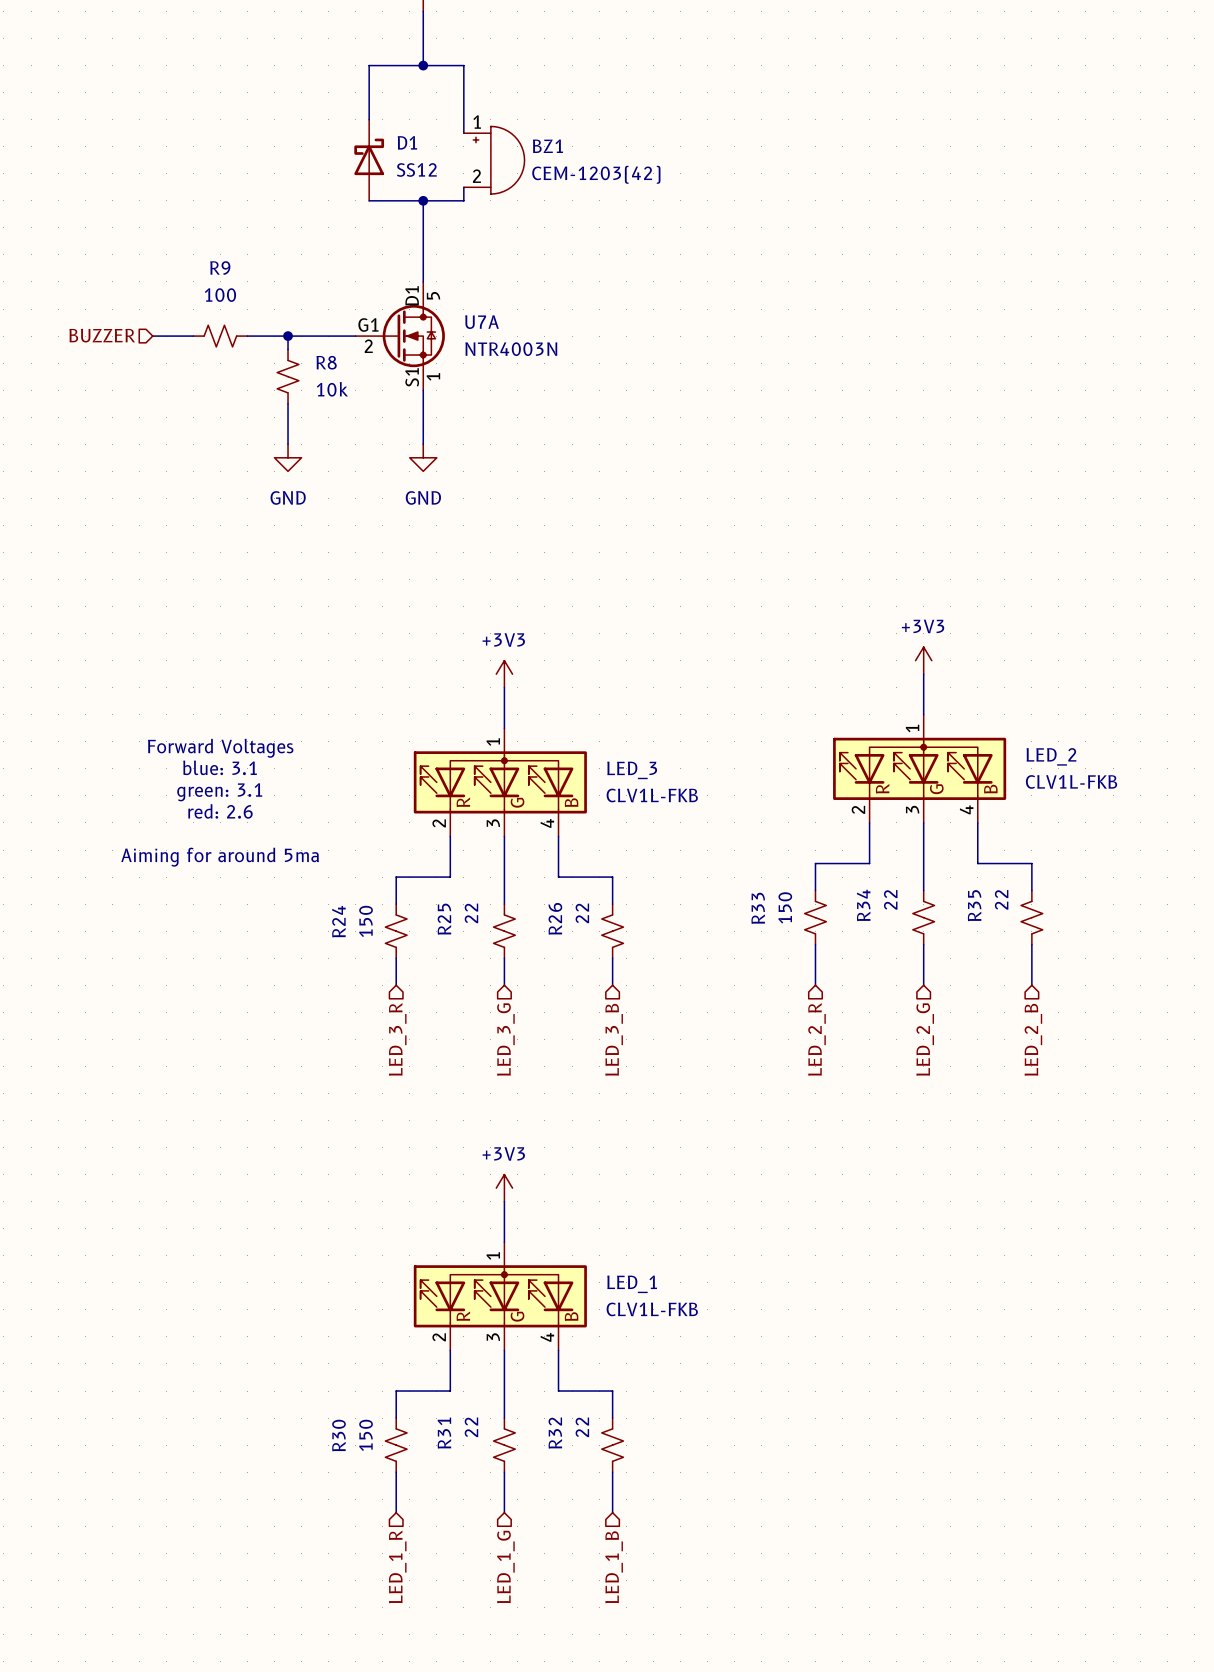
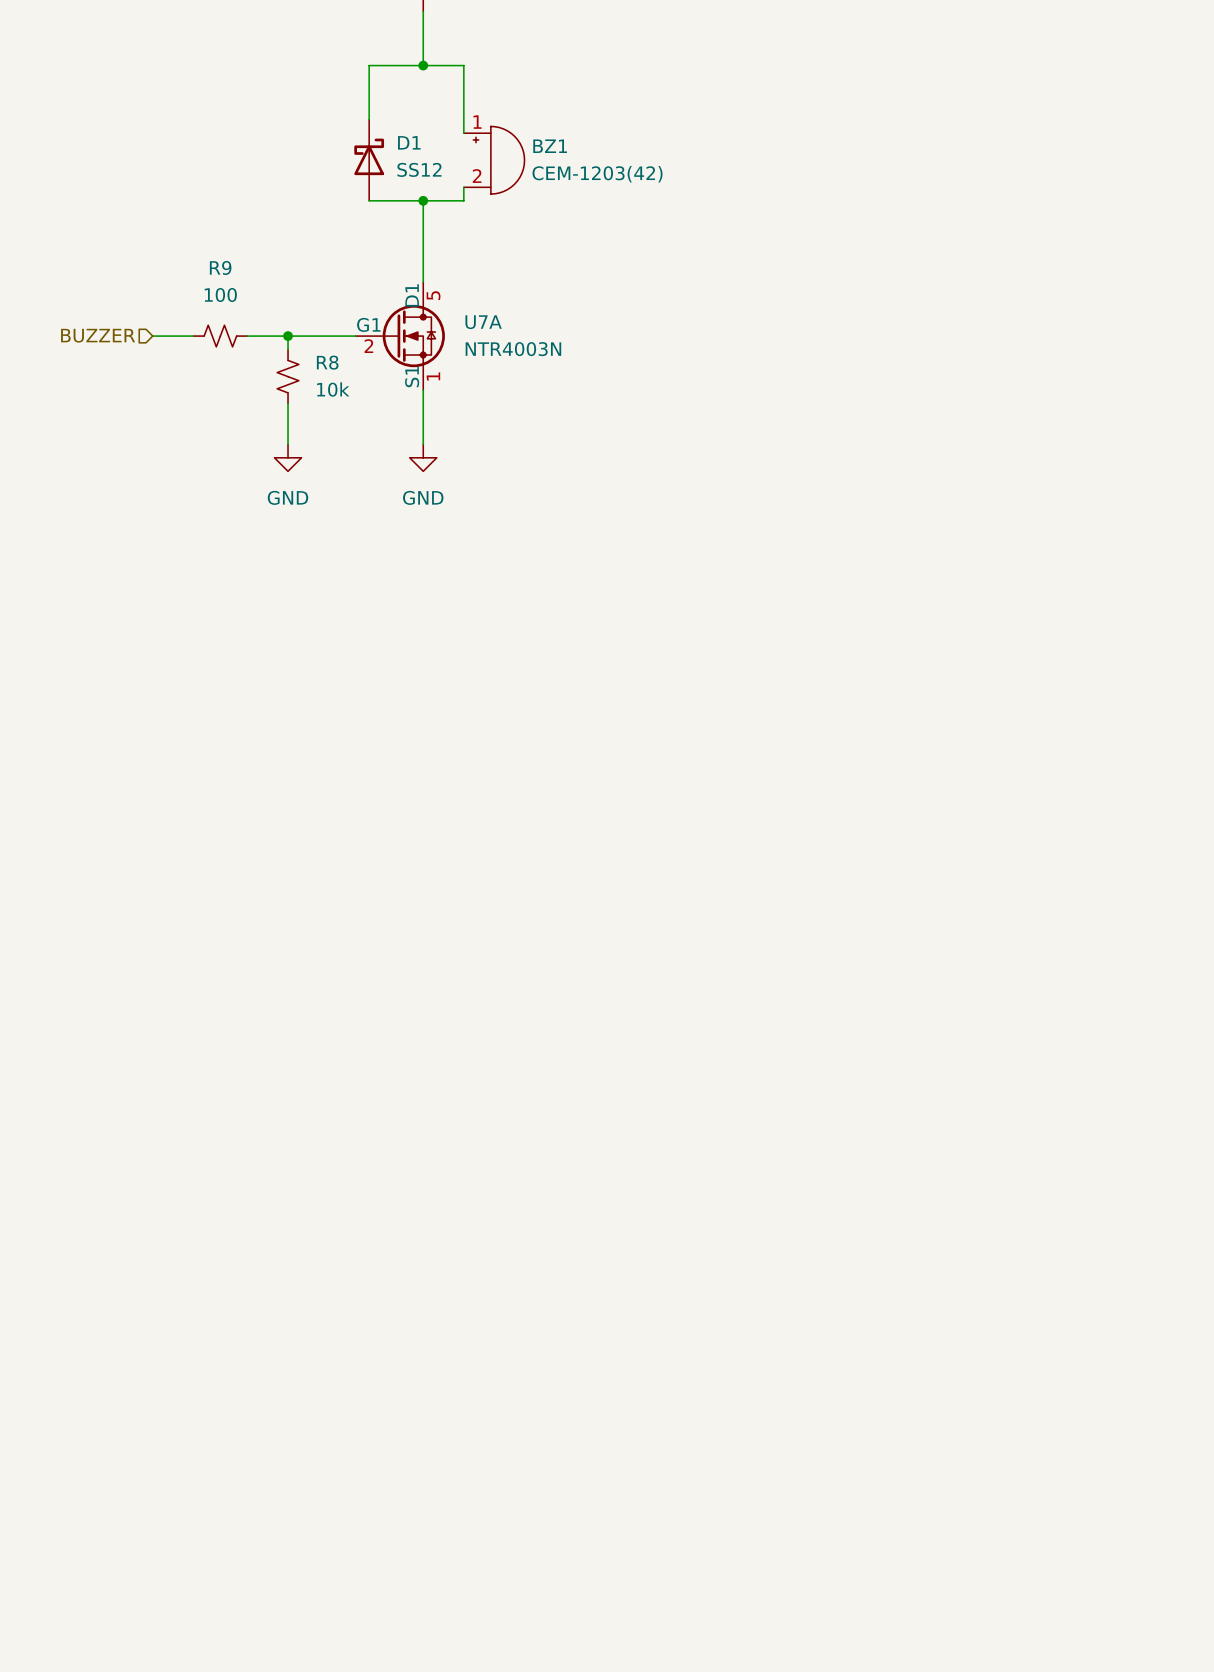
power symbol: +3V3 (923, 660) -> none
power symbol: +3V3 (504, 674) -> none
wire: (923, 674) (923, 714) -> none
wire: (504, 687) (504, 728) -> none
text: Forward Voltages (220, 748) -> none
text: blue: 3.1 (220, 767) -> none
LED_2: CLV1L-FKB (919, 768) -> none
LED_3: CLV1L-FKB (500, 782) -> none
text: green: 3.1 (219, 792) -> none
text: red: 2.6 (220, 811) -> none
wire: (869, 822) (869, 863) (815, 863) (815, 890) -> none
wire: (923, 822) (923, 890) -> none
wire: (977, 822) (977, 863) (1031, 863) (1031, 890) -> none
wire: (450, 836) (450, 877) (396, 877) (396, 904) -> none
wire: (504, 836) (504, 904) -> none
wire: (558, 836) (558, 877) (612, 877) (612, 904) -> none
text: Aiming for around 5ma (220, 857) -> none
R33: 150 (815, 917) -> none
R34: 22 (923, 917) -> none
R35: 22 (1031, 917) -> none
R24: 150 (396, 931) -> none
R25: 22 (504, 931) -> none
R26: 22 (612, 931) -> none
wire: (815, 944) (815, 985) -> none
wire: (923, 944) (923, 985) -> none
wire: (1031, 944) (1031, 985) -> none
wire: (396, 958) (396, 985) -> none
wire: (504, 958) (504, 985) -> none
wire: (612, 958) (612, 985) -> none
hierarchical label: LED_3_R (397, 1039) -> none
hierarchical label: LED_3_G (505, 1039) -> none
hierarchical label: LED_3_B (614, 1039) -> none
hierarchical label: LED_2_R (817, 1039) -> none
hierarchical label: LED_2_G (925, 1039) -> none
hierarchical label: LED_2_B (1033, 1039) -> none
power symbol: +3V3 (504, 1188) -> none
wire: (504, 1201) (504, 1242) -> none
LED_1: CLV1L-FKB (500, 1296) -> none
wire: (450, 1350) (450, 1391) (396, 1391) (396, 1418) -> none
wire: (504, 1350) (504, 1418) -> none
wire: (558, 1350) (558, 1391) (612, 1391) (612, 1418) -> none
R30: 150 (396, 1445) -> none
R31: 22 (504, 1445) -> none
R32: 22 (612, 1445) -> none
wire: (396, 1472) (396, 1512) -> none
wire: (504, 1472) (504, 1512) -> none
wire: (612, 1472) (612, 1512) -> none
hierarchical label: LED_1_R (397, 1566) -> none
hierarchical label: LED_1_G (505, 1567) -> none
hierarchical label: LED_1_B (614, 1567) -> none

